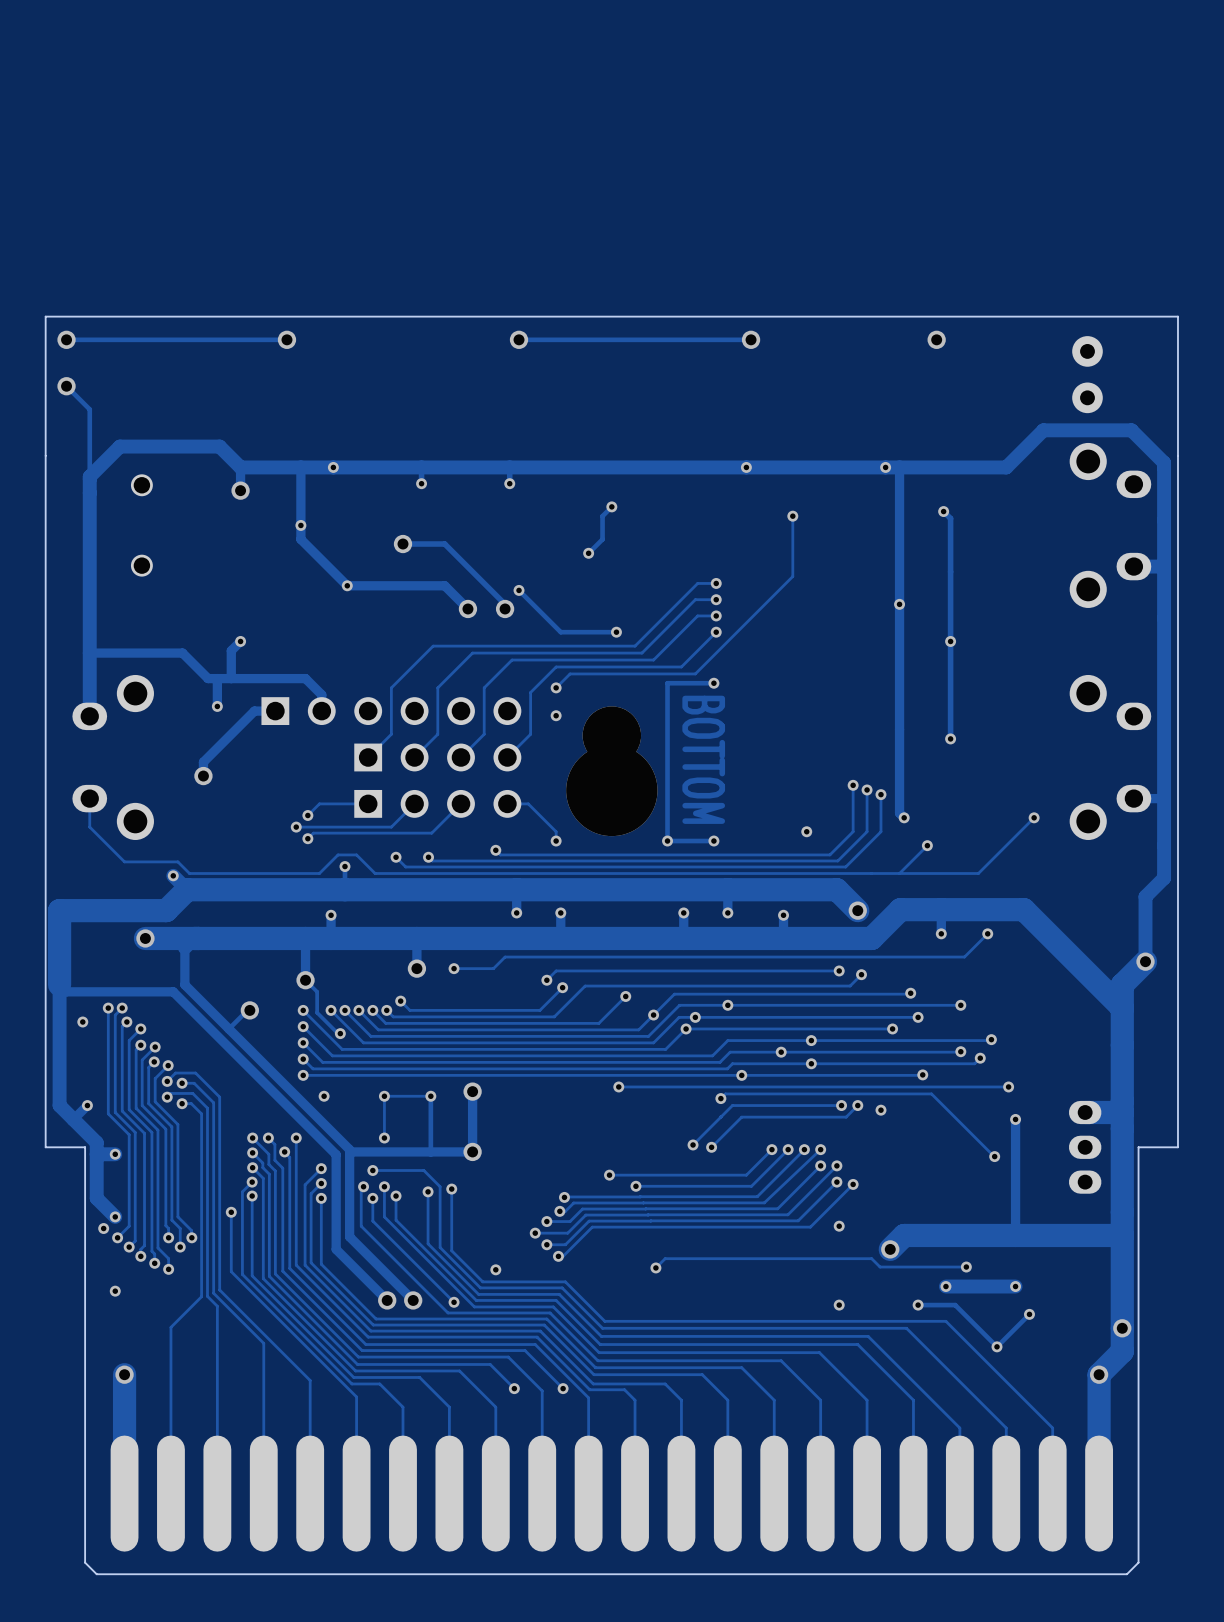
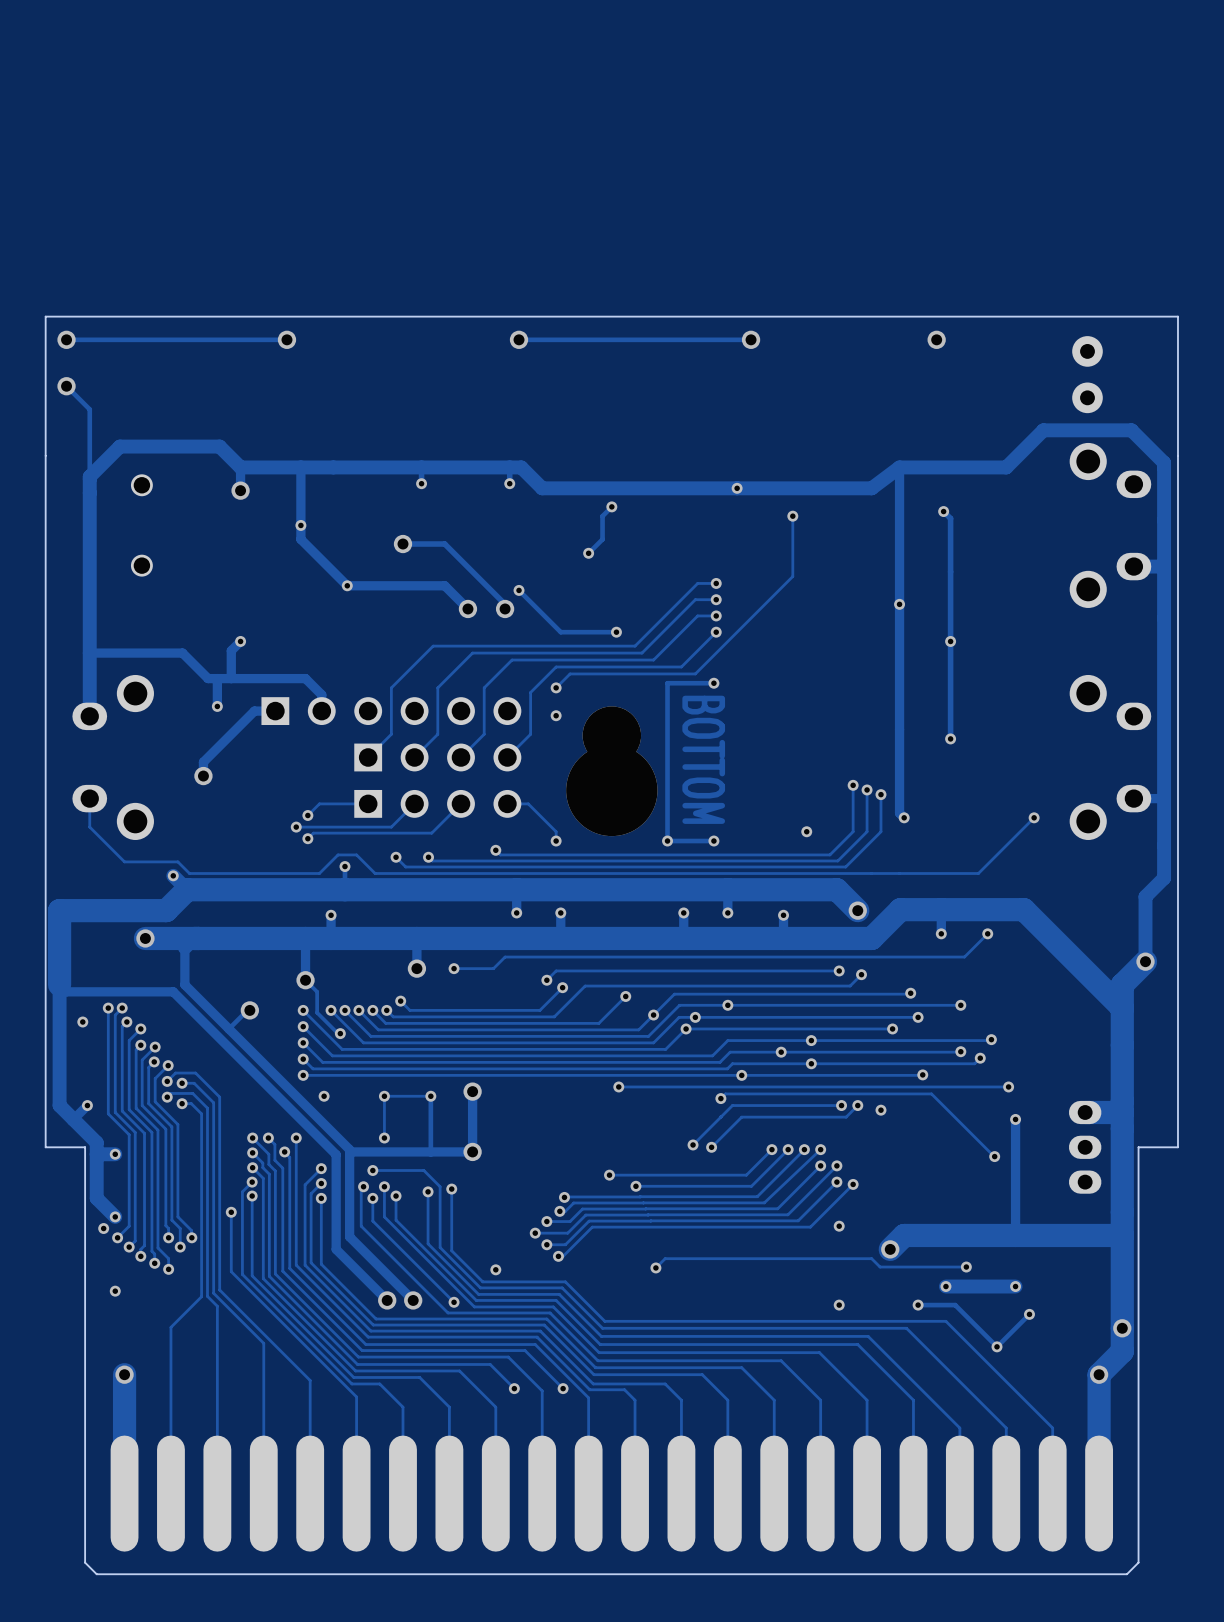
via: (333, 467) -> none
via position: (746, 467) -> (737, 488)
via: (885, 467) -> none
track: (899, 467) (521, 467) -> (899, 467) (871, 488) (542, 488) (521, 467)
track: (927, 845) (899, 873) -> none
via: (927, 845) -> none

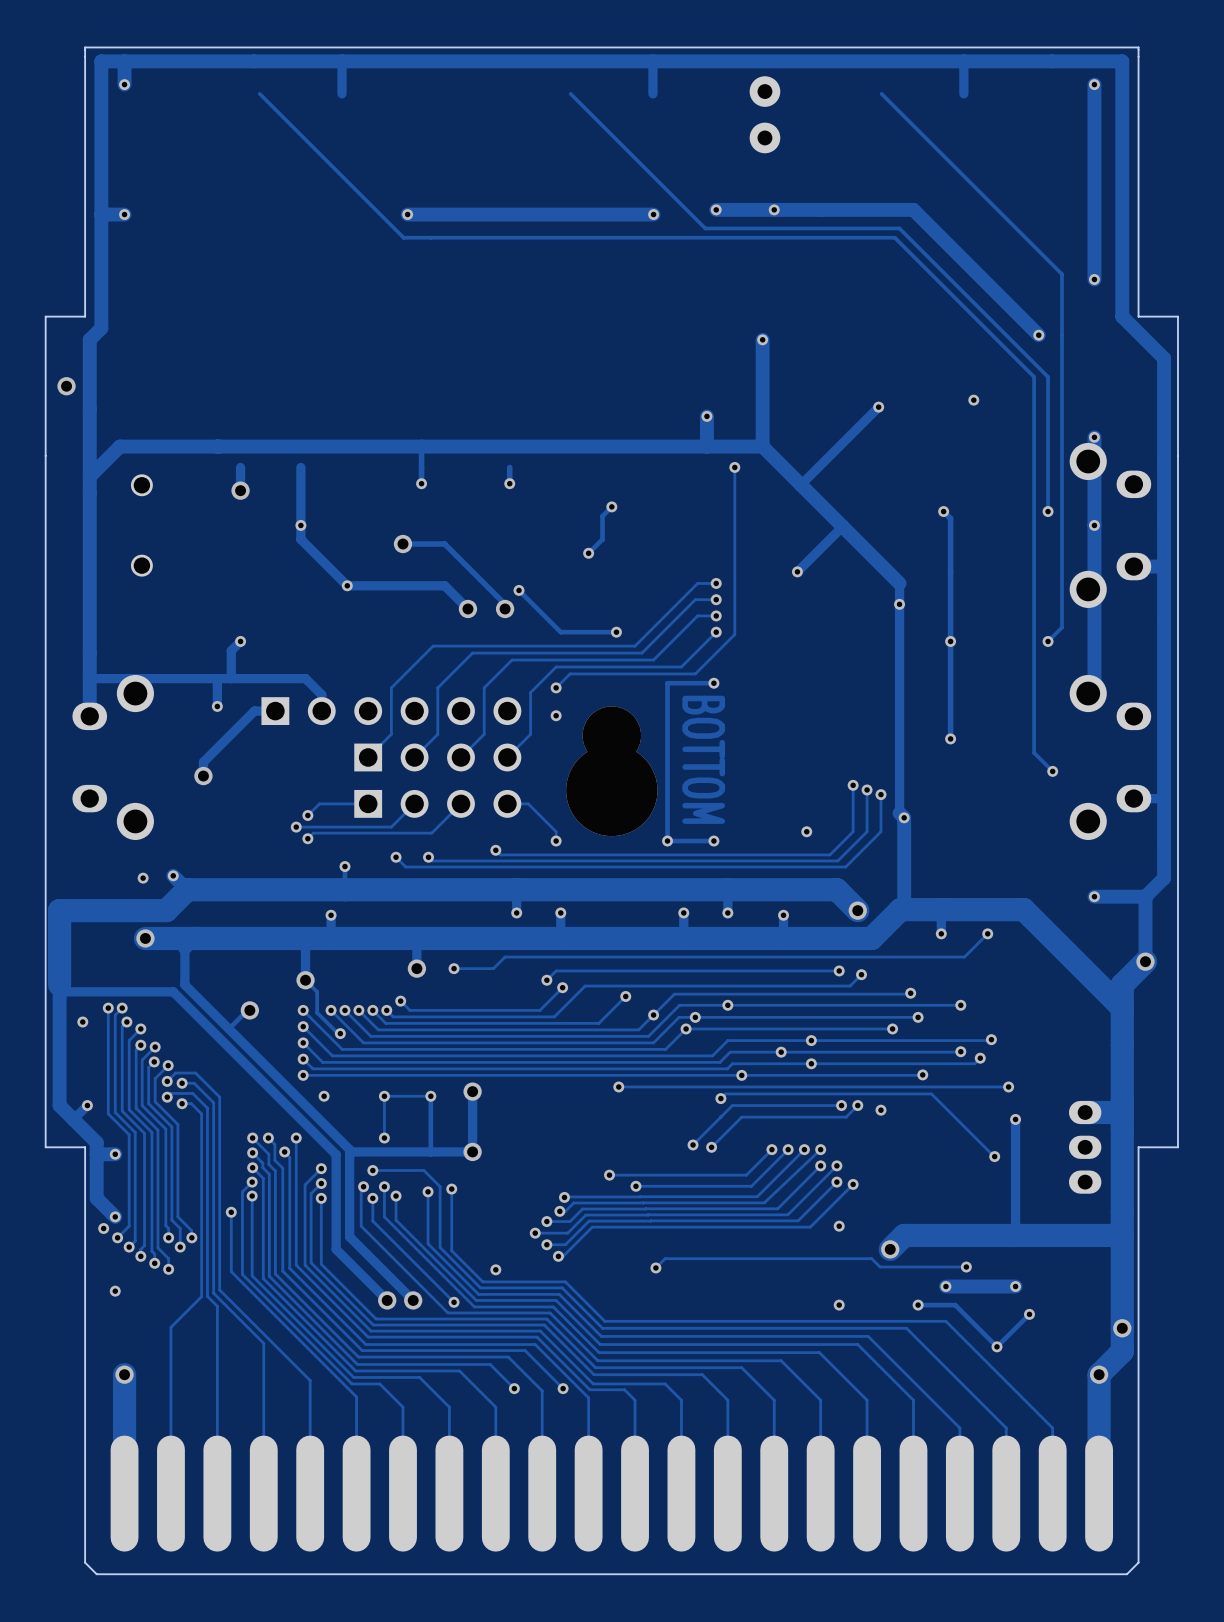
track: none -> (124, 61) (124, 84)
track: none -> (342, 61) (342, 93)
track: none -> (652, 61) (652, 93)
track: none -> (963, 61) (963, 93)
via: none -> (124, 84)
track: none -> (1094, 84) (1094, 279)
via: none -> (1094, 84)
track: none -> (259, 93) (403, 237) (894, 237) (1034, 376) (1034, 752) (1052, 771)
track: none -> (570, 93) (705, 228) (899, 228) (1048, 376) (1048, 511)
track: none -> (881, 93) (1061, 274) (1061, 627) (1048, 641)
track: none -> (716, 209) (913, 209) (1038, 335)
via: none -> (716, 209)
via: none -> (774, 209)
track: none -> (124, 214) (101, 214)
via: none -> (124, 214)
via: none -> (407, 214)
track: none -> (653, 214) (407, 214)
via: none -> (653, 214)
via: none -> (1094, 279)
board edge: (1138, 316) (85, 316) -> (1138, 316) (1138, 47) (85, 47) (85, 316)
via size: [741, 330, 761, 349] -> [757, 334, 769, 346]
via: none -> (1038, 335)
via: (66, 339) -> none
track: (286, 339) (66, 339) -> none
via: (286, 339) -> none
via: (519, 339) -> none
track: (751, 339) (519, 339) -> none
track: none -> (762, 339) (762, 446)
via: (936, 339) -> none
part position: (1087, 374) -> (764, 114)
track: (66, 386) (89, 409) -> none
via: none -> (973, 400)
track: none -> (878, 407) (800, 484)
via: none -> (878, 407)
track width: thin (89, 409) (89, 476) -> thick (89, 409) (89, 476)
track: none -> (706, 416) (706, 446)
via: none -> (706, 416)
track: none -> (1094, 437) (1094, 697)
via: none -> (1094, 437)
track: (219, 446) (240, 467) (521, 467) (542, 488) (871, 488) (899, 467) -> (219, 446) (762, 446)
track: none -> (421, 446) (421, 467)
track: (1164, 462) (1131, 430) (1043, 430) (1006, 467) (899, 467) -> (1164, 462) (1164, 358) (1122, 316) (1122, 61) (101, 61) (101, 328) (89, 339) (89, 409)
track: (899, 467) (899, 583) -> (762, 446) (899, 583)
via position: (737, 488) -> (734, 467)
via: none -> (1048, 511)
track: (792, 516) (792, 576) (734, 634) -> (734, 467) (734, 634)
via: (792, 516) -> none
via: none -> (1094, 525)
track: none -> (842, 526) (797, 571)
via: none -> (797, 571)
via: none -> (1048, 641)
track: (89, 653) (182, 653) (208, 678) -> (89, 678) (208, 678)
via: none -> (1052, 771)
track: (89, 798) (89, 827) (124, 861) (177, 861) (189, 873) (319, 873) (338, 854) (356, 854) (375, 873) (978, 873) (1034, 817) -> none
track: none -> (899, 813) (904, 817) (904, 909)
via: (1034, 817) -> none
via: none -> (143, 878)
via: none -> (1094, 896)
track: none -> (1145, 896) (1094, 896)

